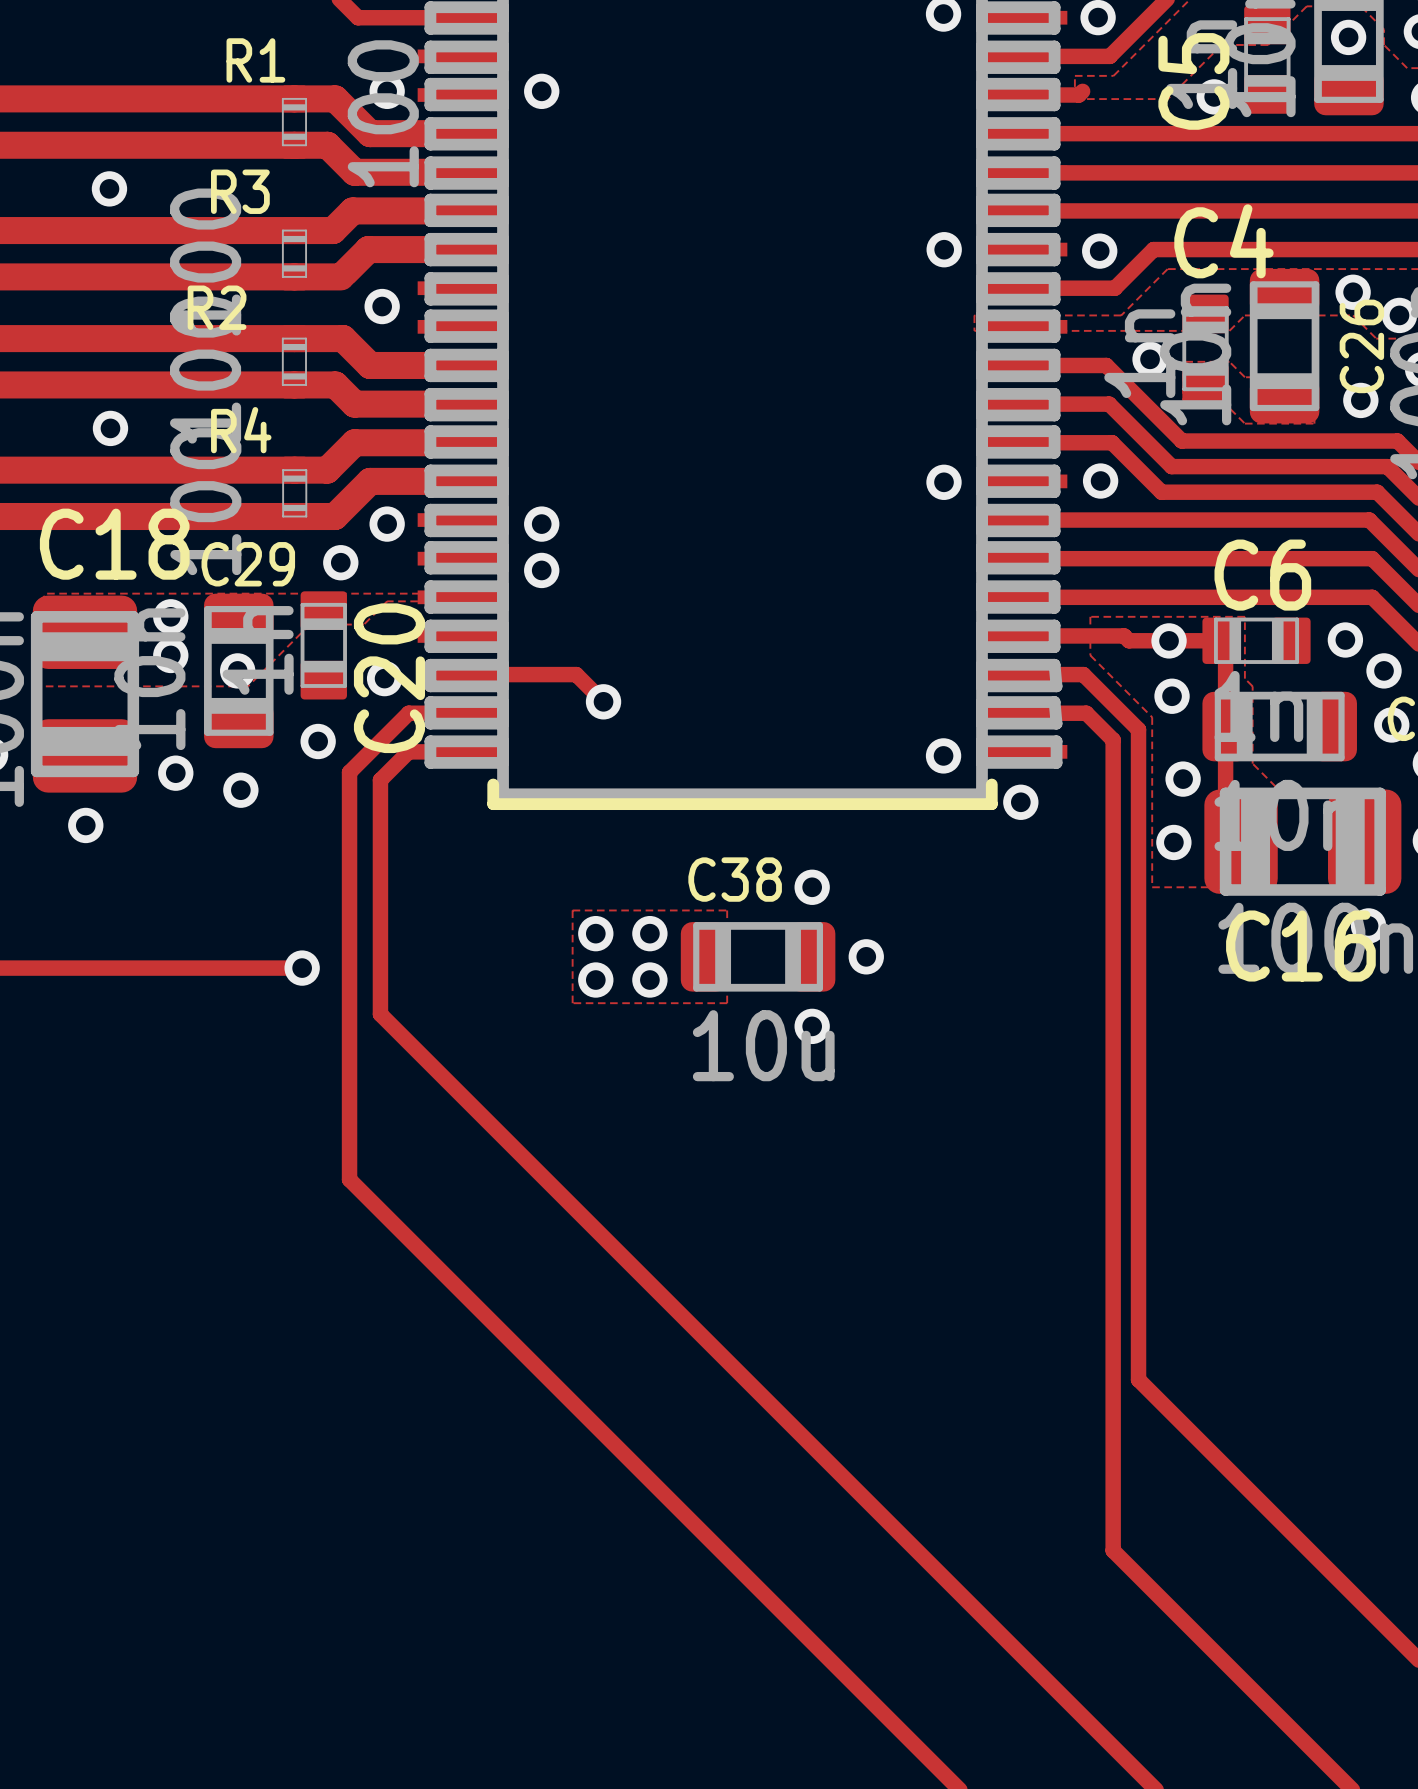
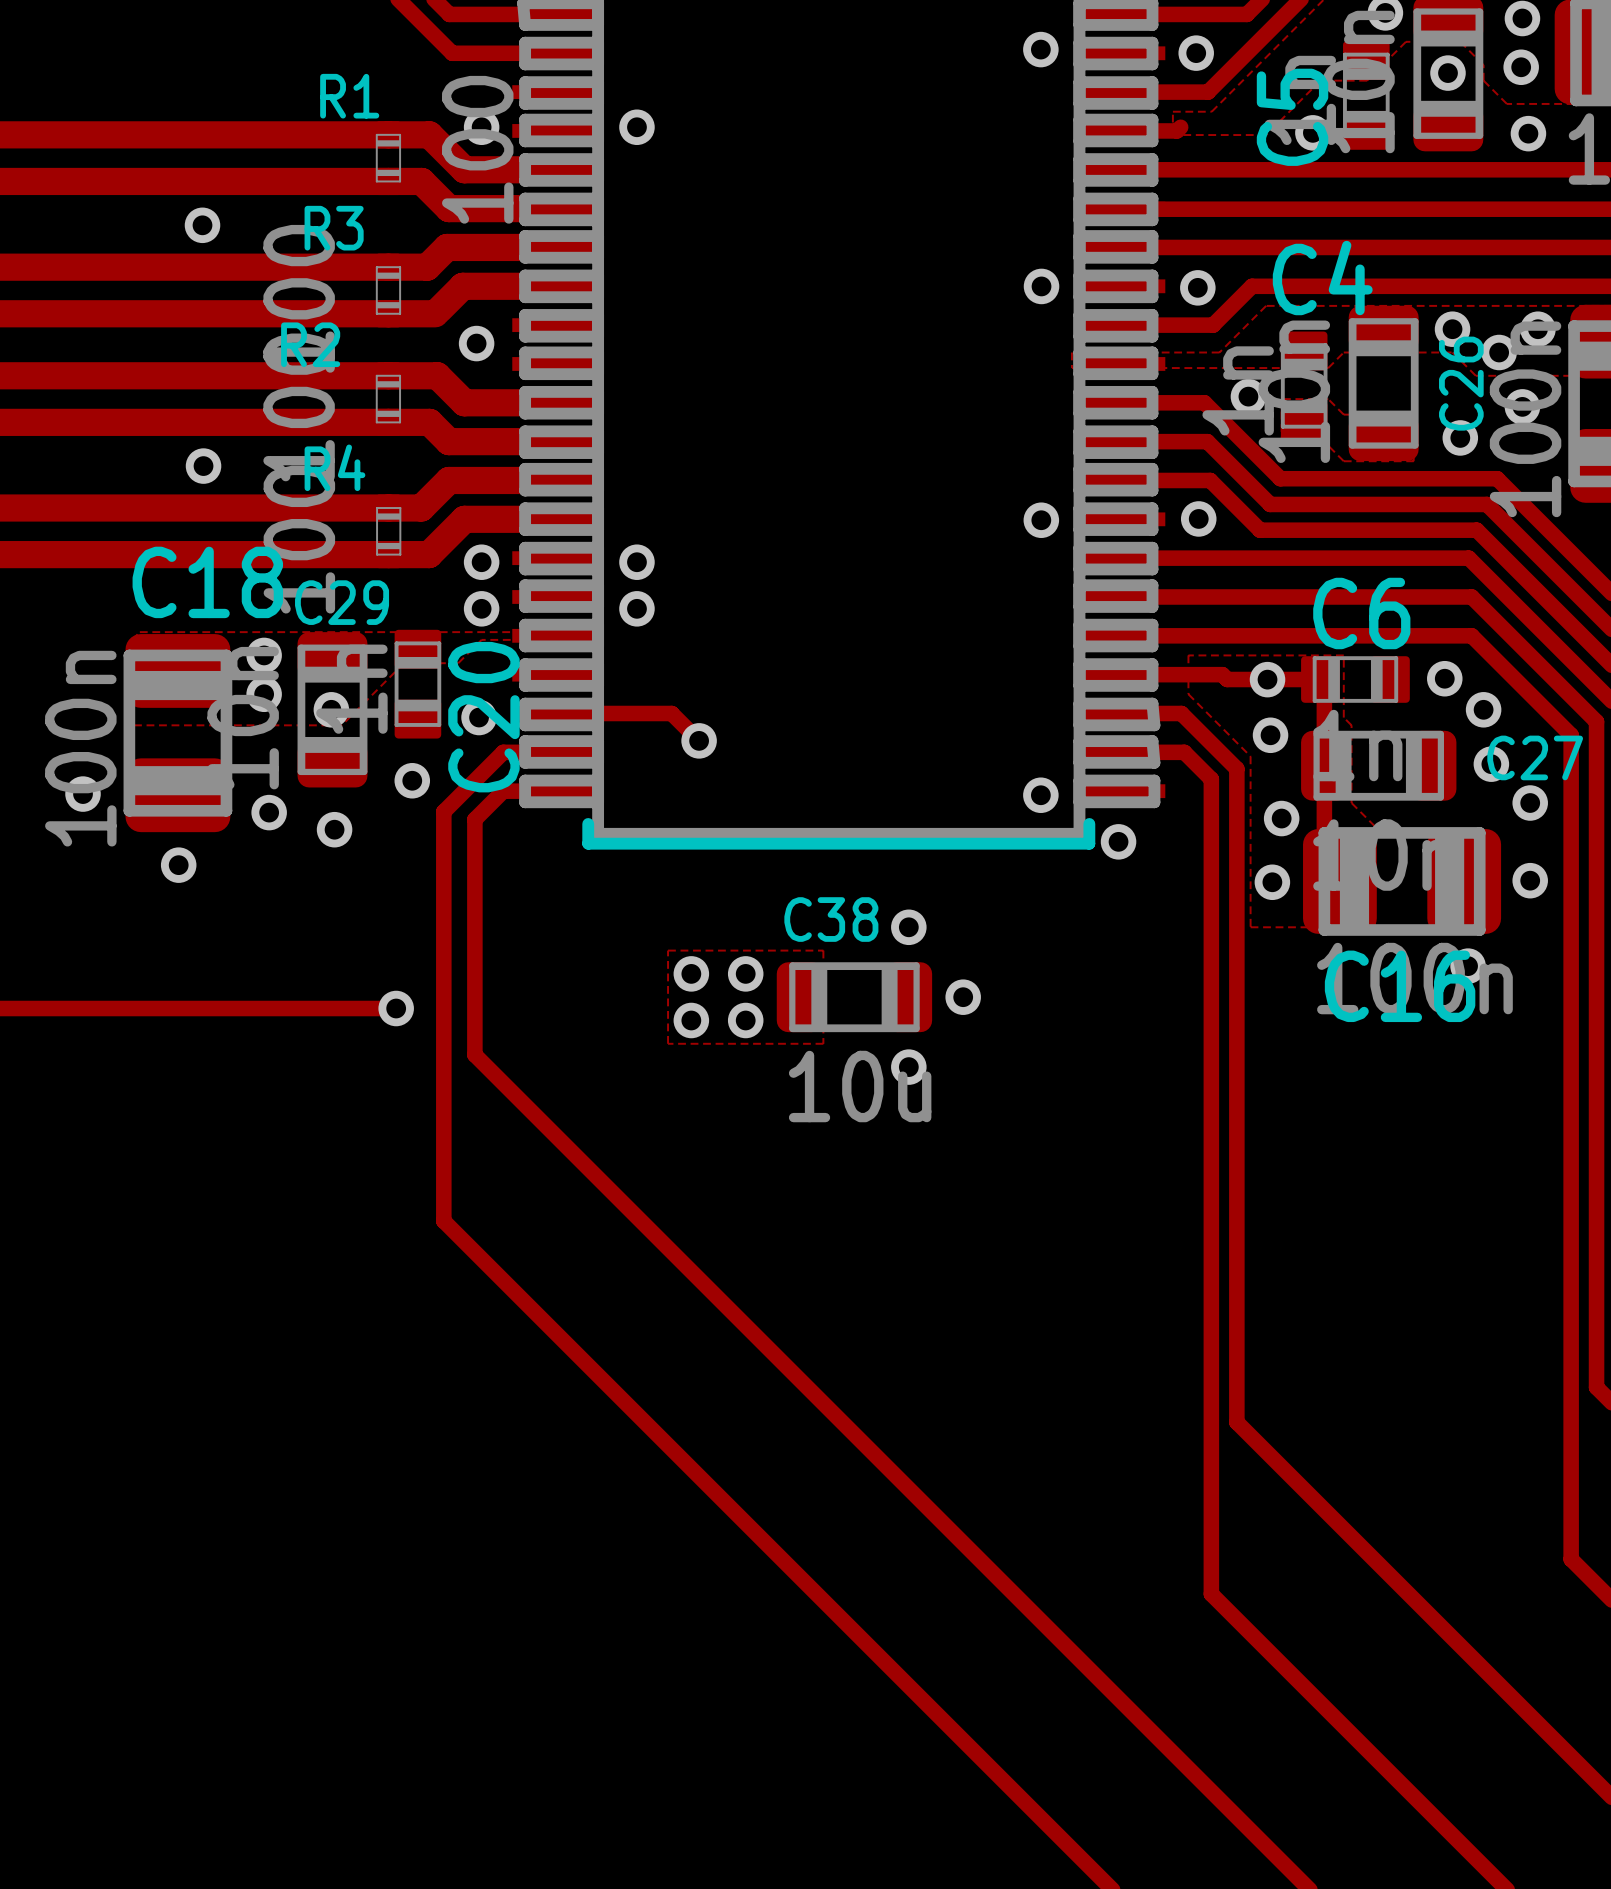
via position: (340, 562) -> (481, 608)

